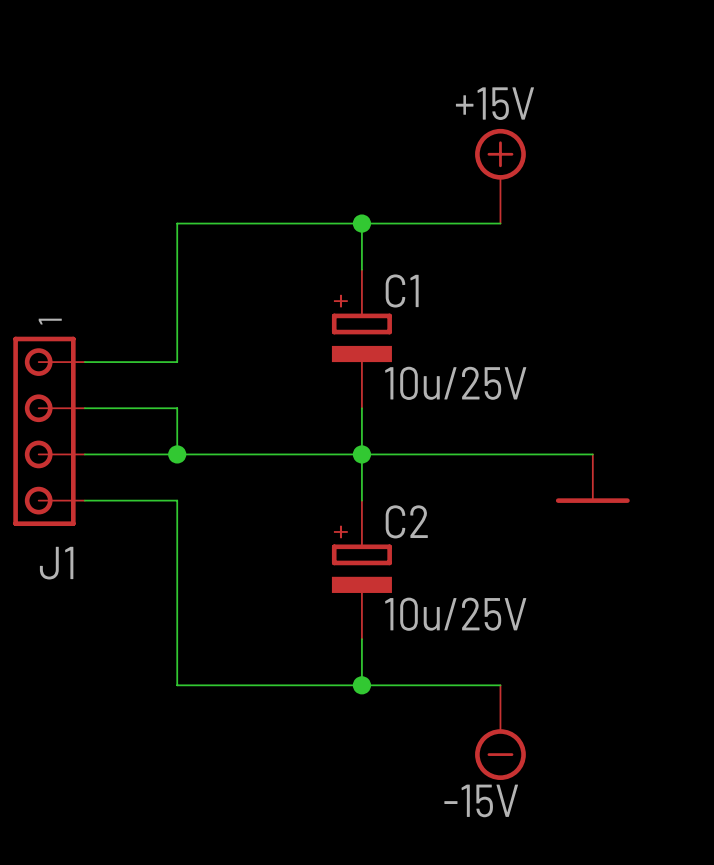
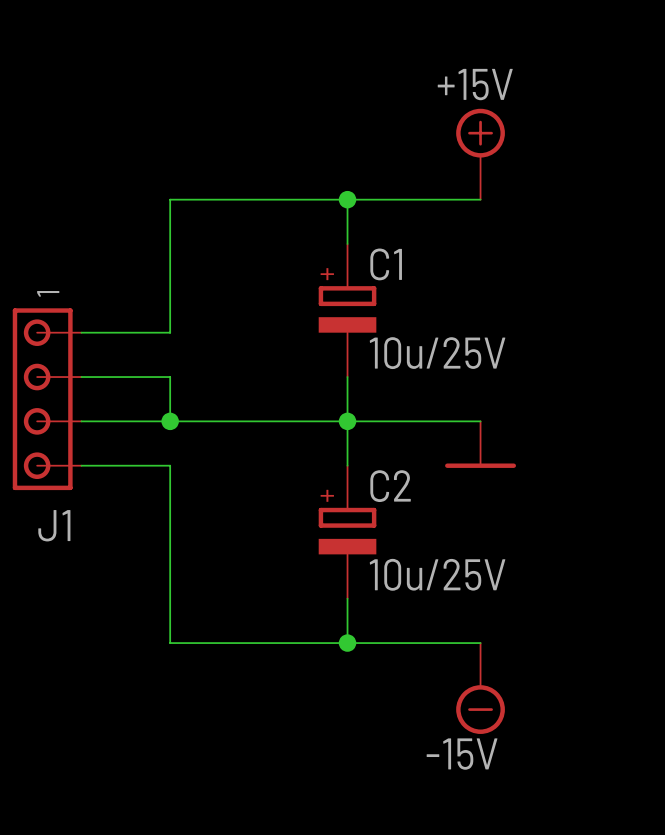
wire: (500, 454) (592, 454) -> none
power symbol position: (592, 478) -> (480, 444)

